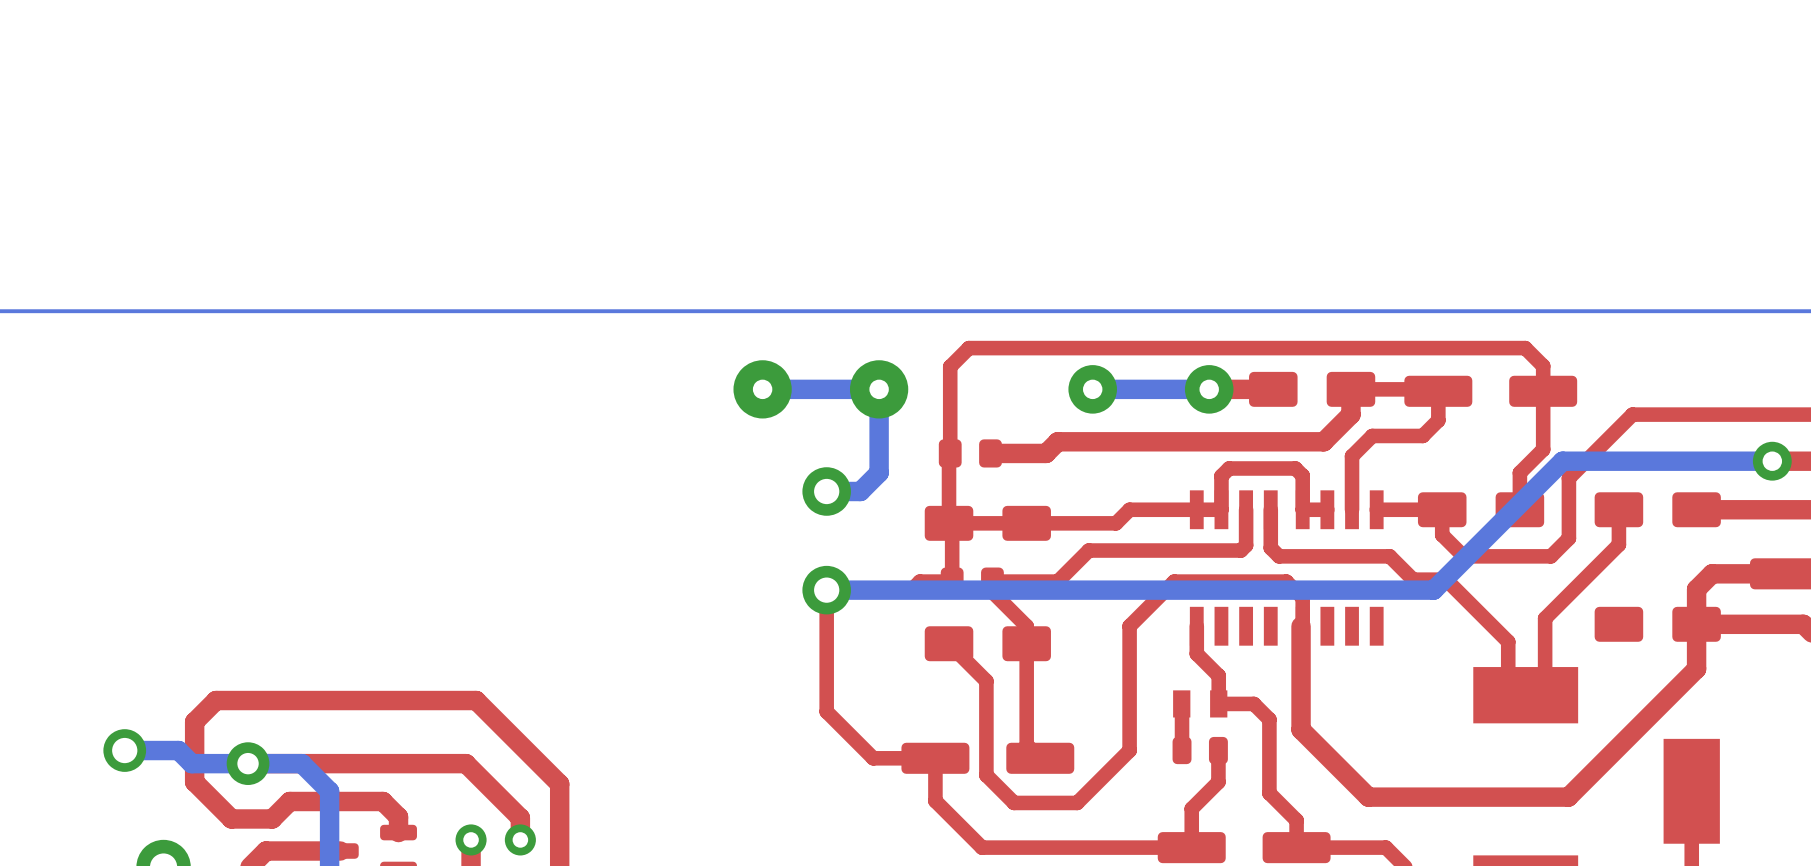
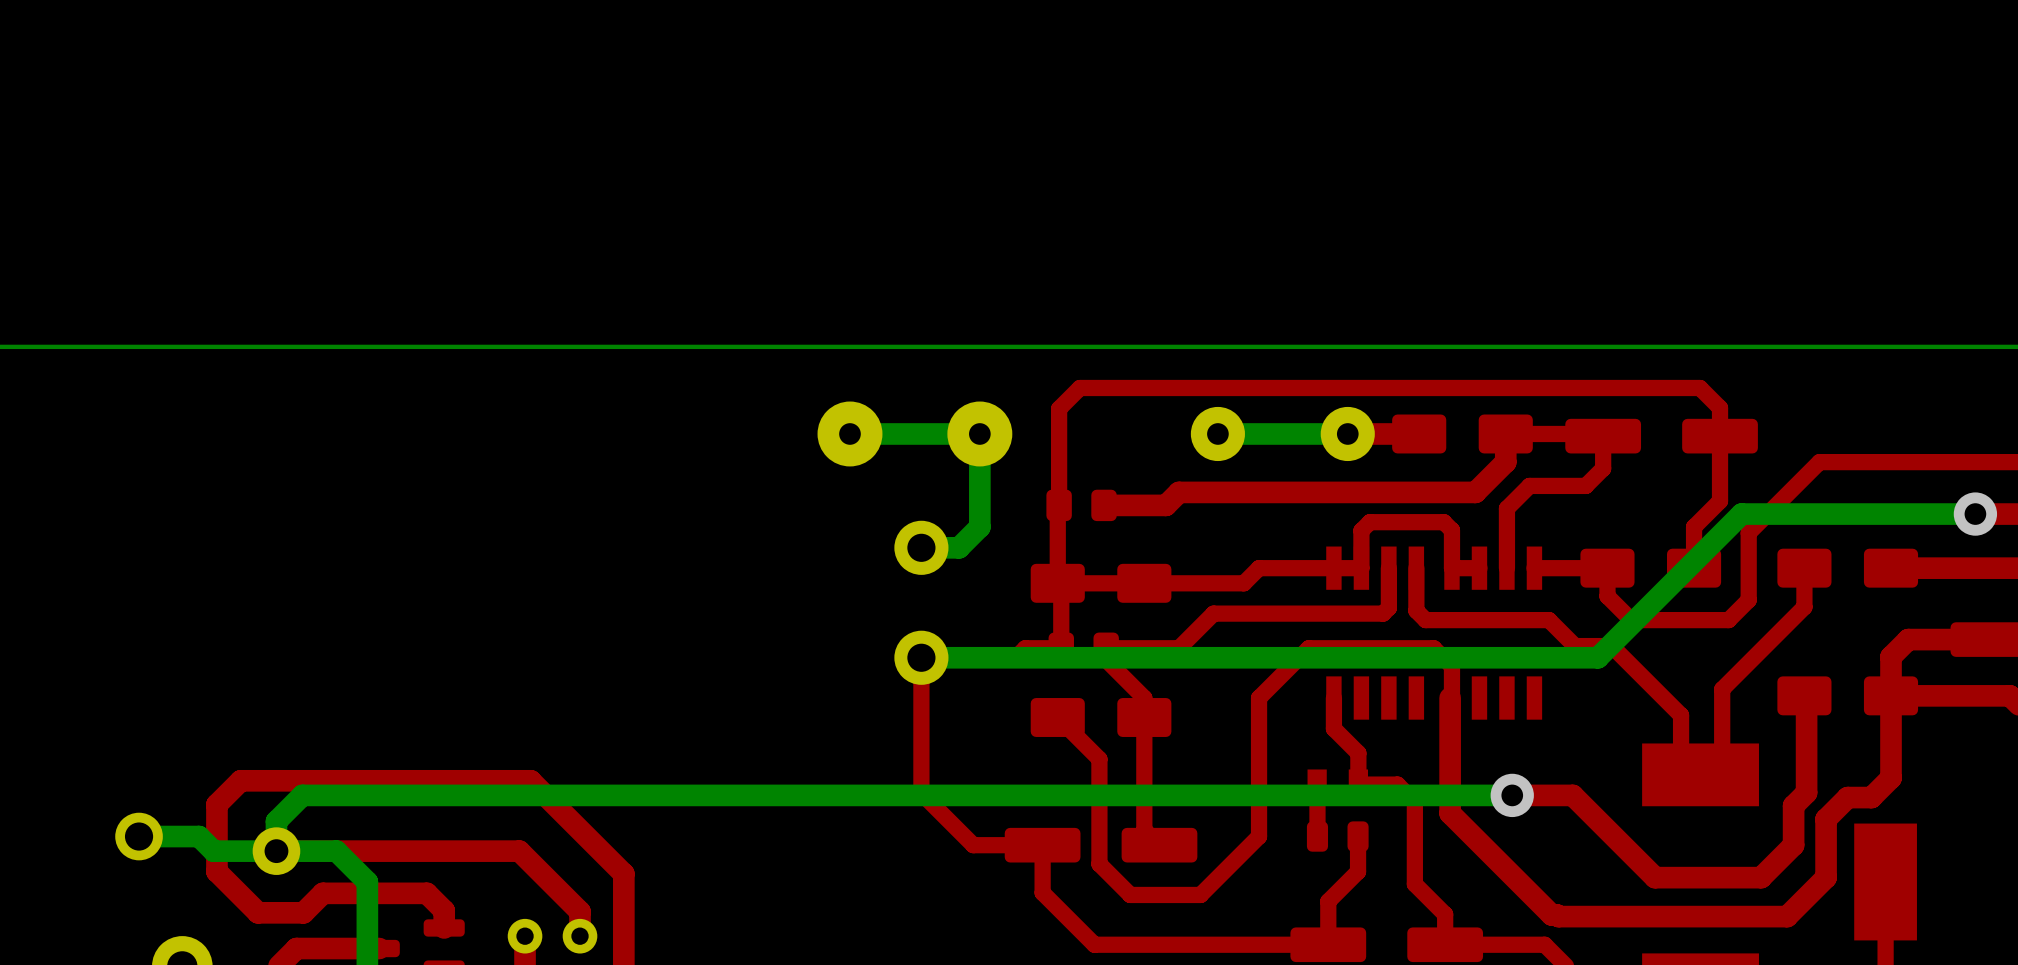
top track: none -> (1804, 695) (1806, 698) (1806, 792) (1793, 805) (1793, 845) (1761, 877) (1655, 877) (1572, 795) (1512, 795)
top track: (1696, 668) (1568, 797) (1368, 797) -> (1891, 745) (1891, 778) (1871, 797) (1847, 797) (1826, 819) (1826, 877) (1787, 916) (1558, 916) (1551, 914) (1525, 888)
bottom track: none -> (1512, 795) (302, 795) (276, 821) (276, 851)
via: none -> (1512, 795)

